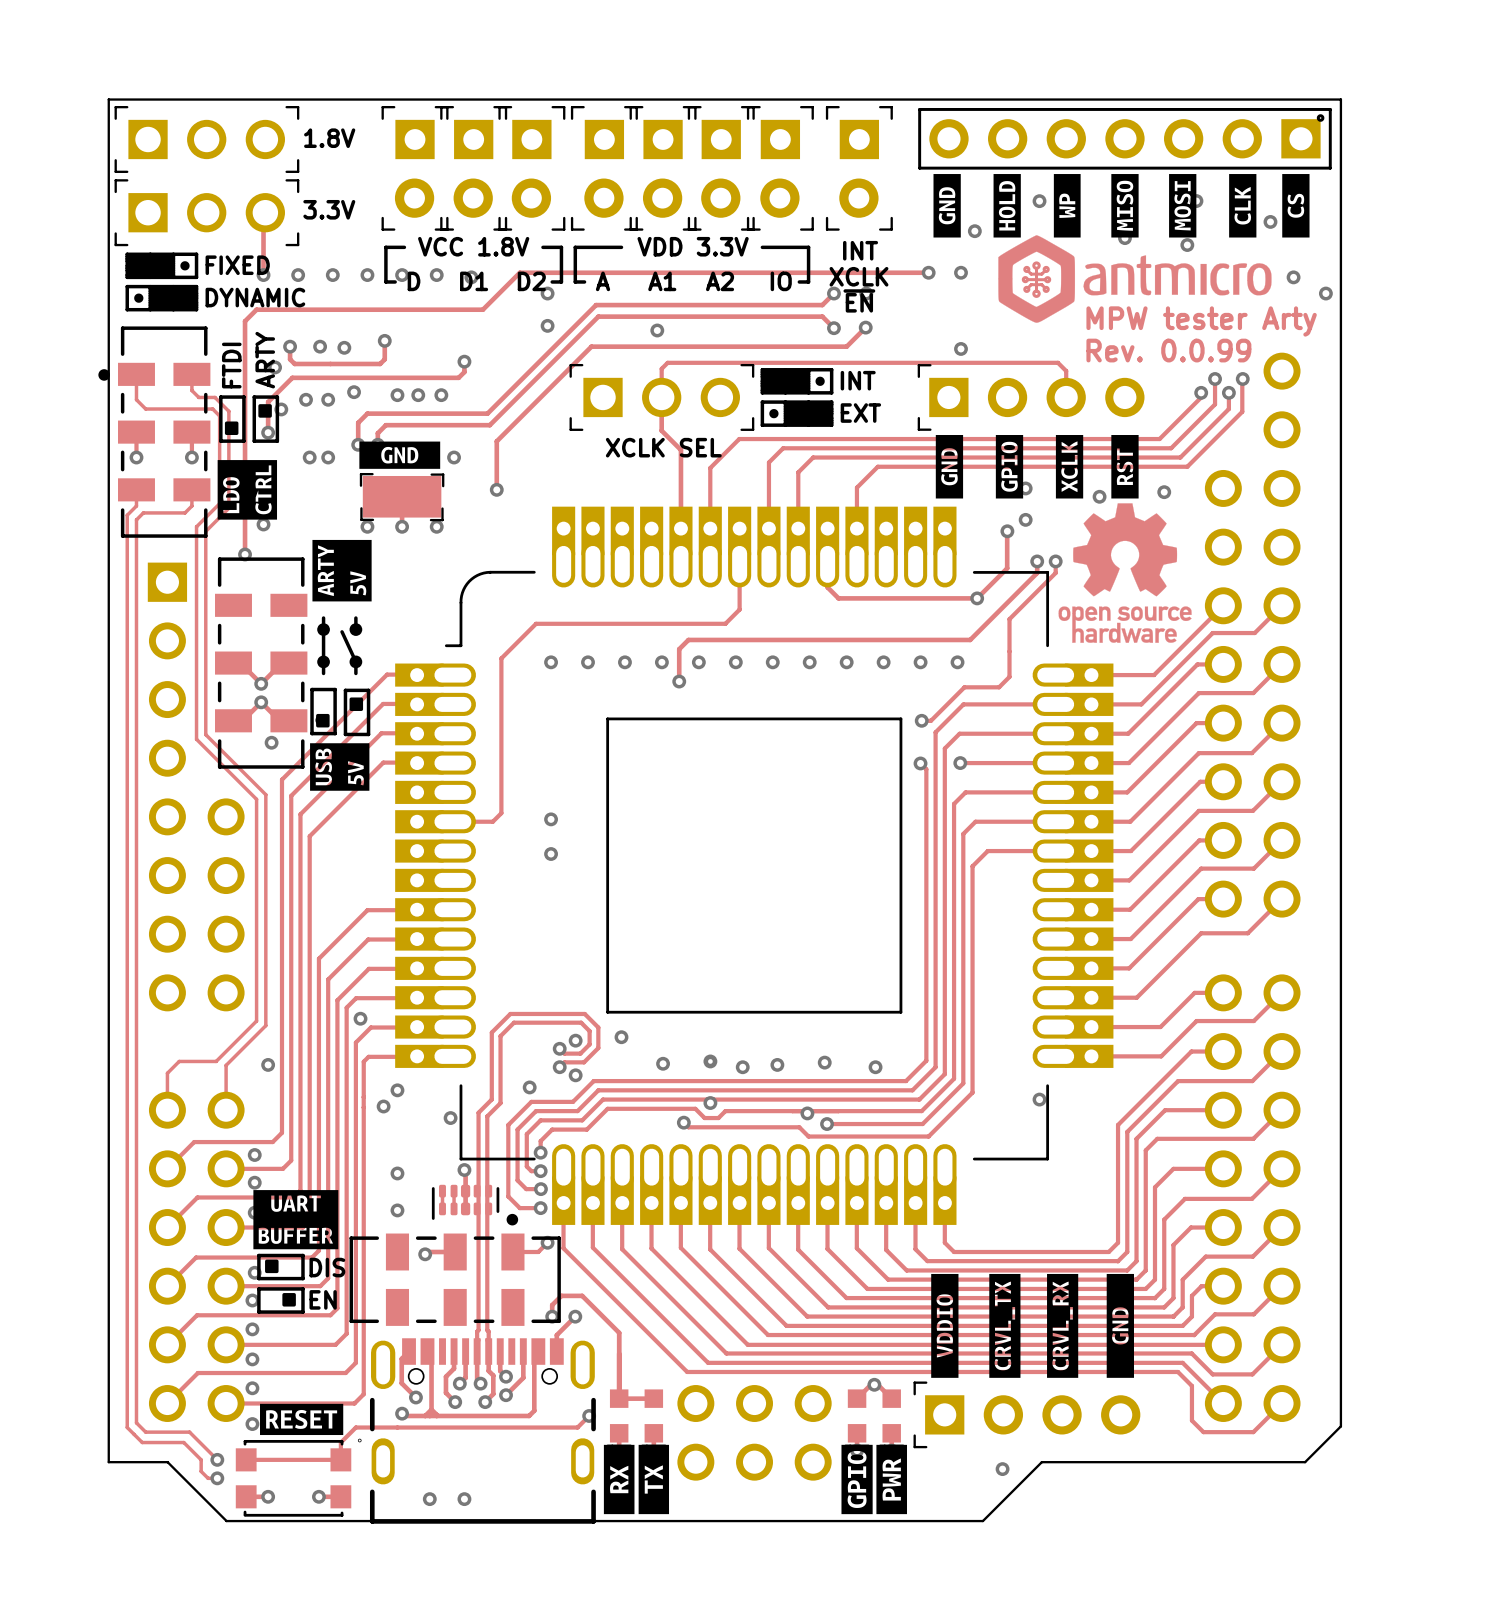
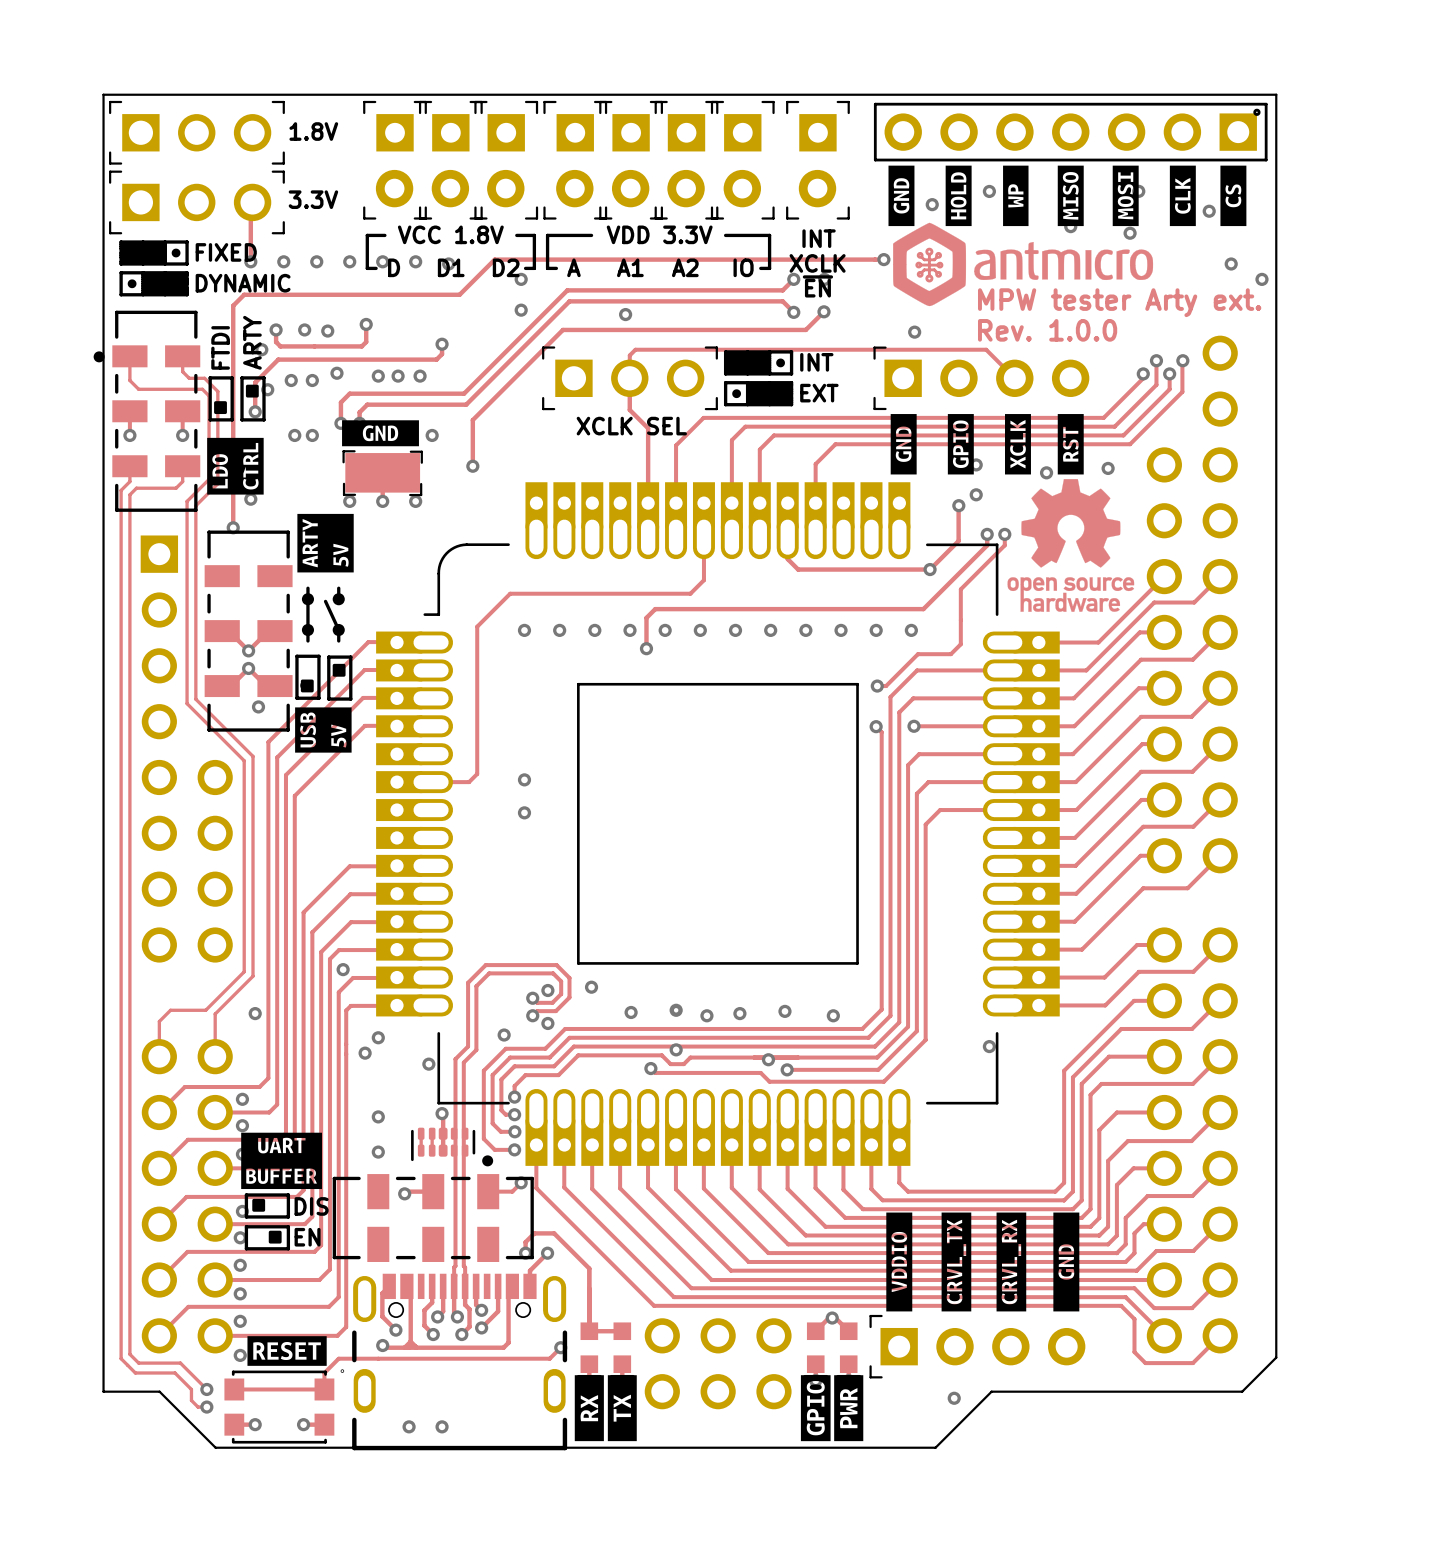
via position: (974, 231) -> (932, 204)
via: (960, 272) -> none
drawing position: (1134, 279) -> (1023, 264)
text: MPW tester Arty (1201, 321) -> MPW tester Arty ext. (1119, 302)
text: Rev. 0.0.99 (1168, 350) -> Rev. 1.0.0 (1047, 330)
track: (661, 373) (661, 368) (667, 362) (1057, 362) (1066, 371) (1066, 397) -> (629, 355) (635, 349) (986, 349) (1014, 378)

